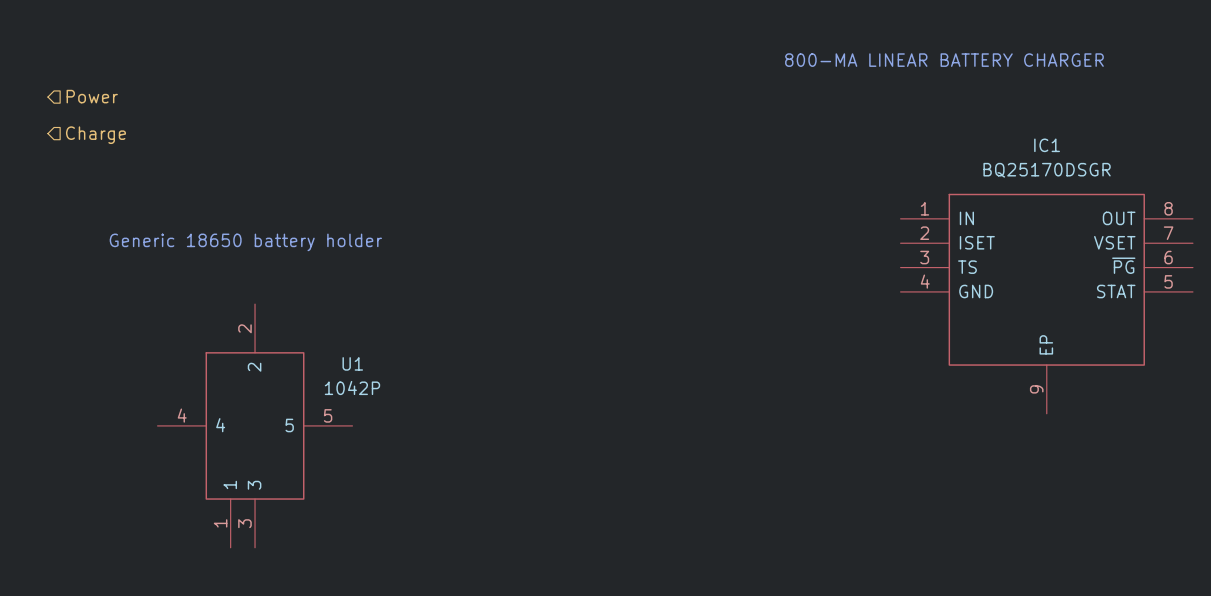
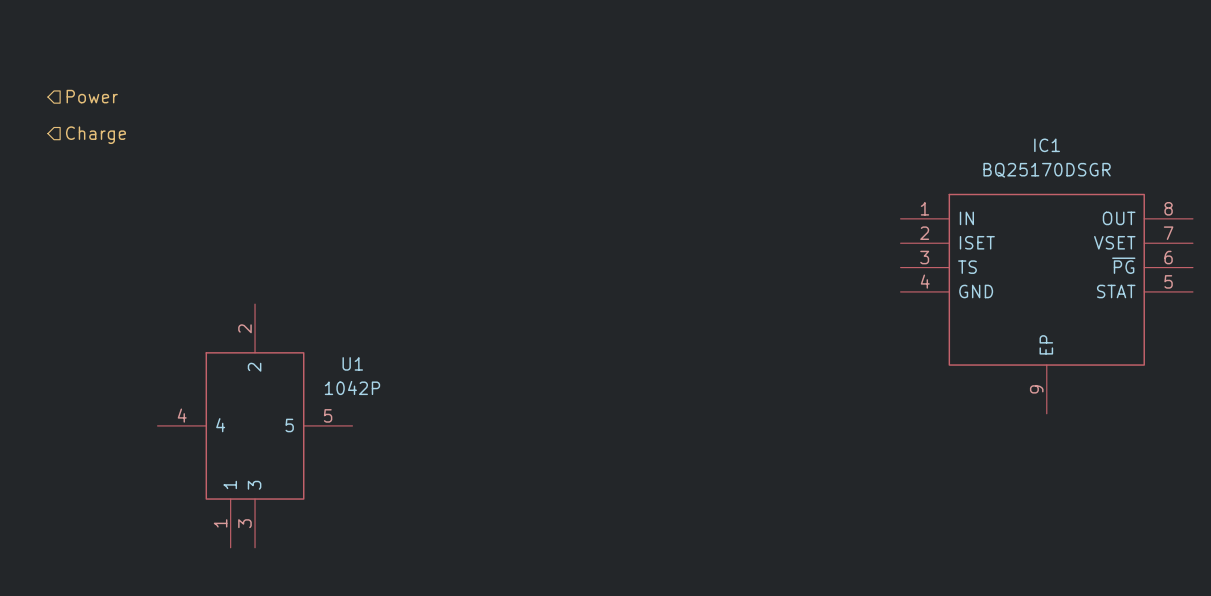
text: 800-MA LINEAR BATTERY CHARGER (944, 60) -> none
text: Generic 18650 battery holder (245, 242) -> none

